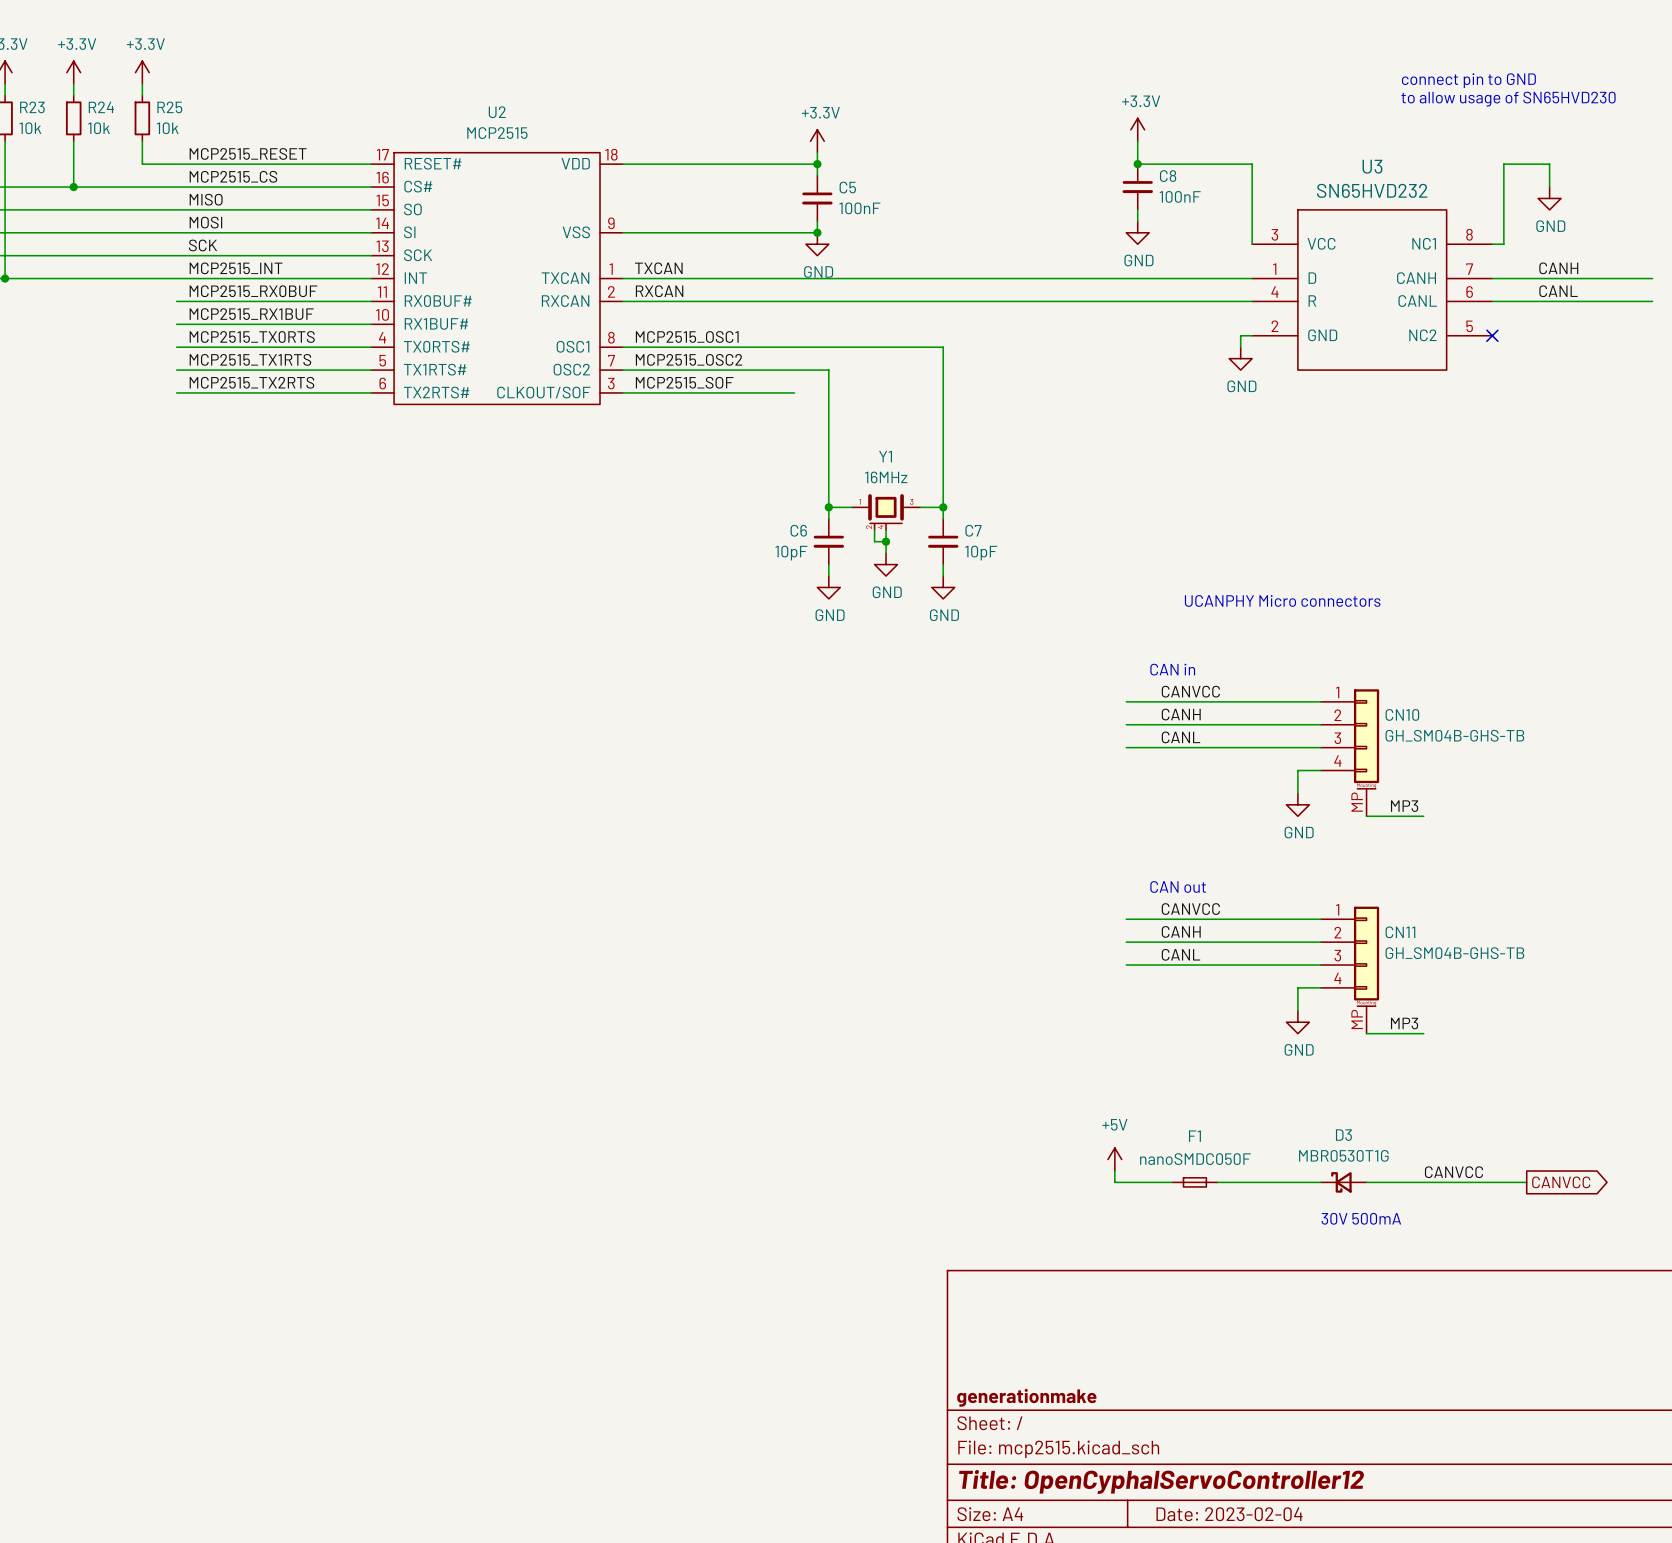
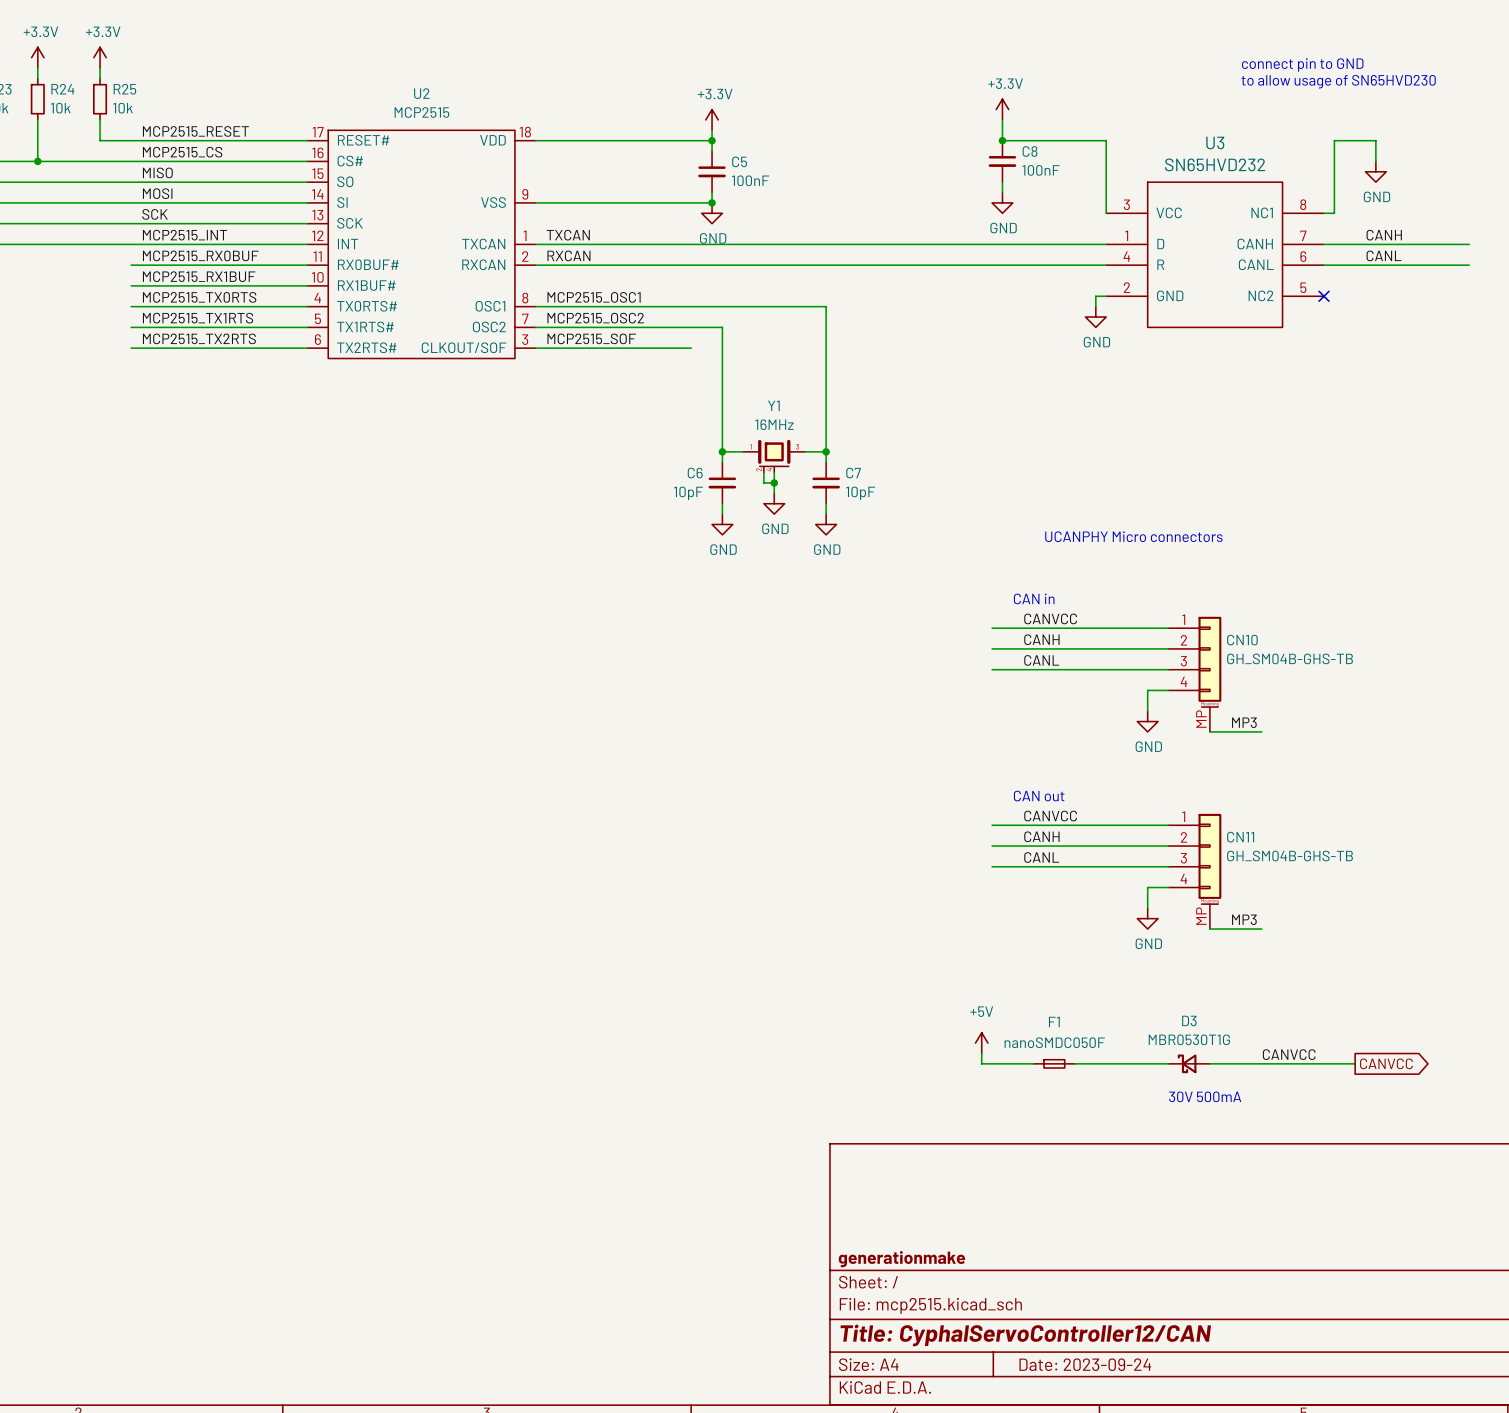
title block: Title: OpenCyphalServoController12 (1161, 1481) -> Title: CyphalServoController12/CAN (1025, 1335)
title block: Date: 2023-02-04 (1229, 1514) -> Date: 2023-09-24 (1085, 1364)

